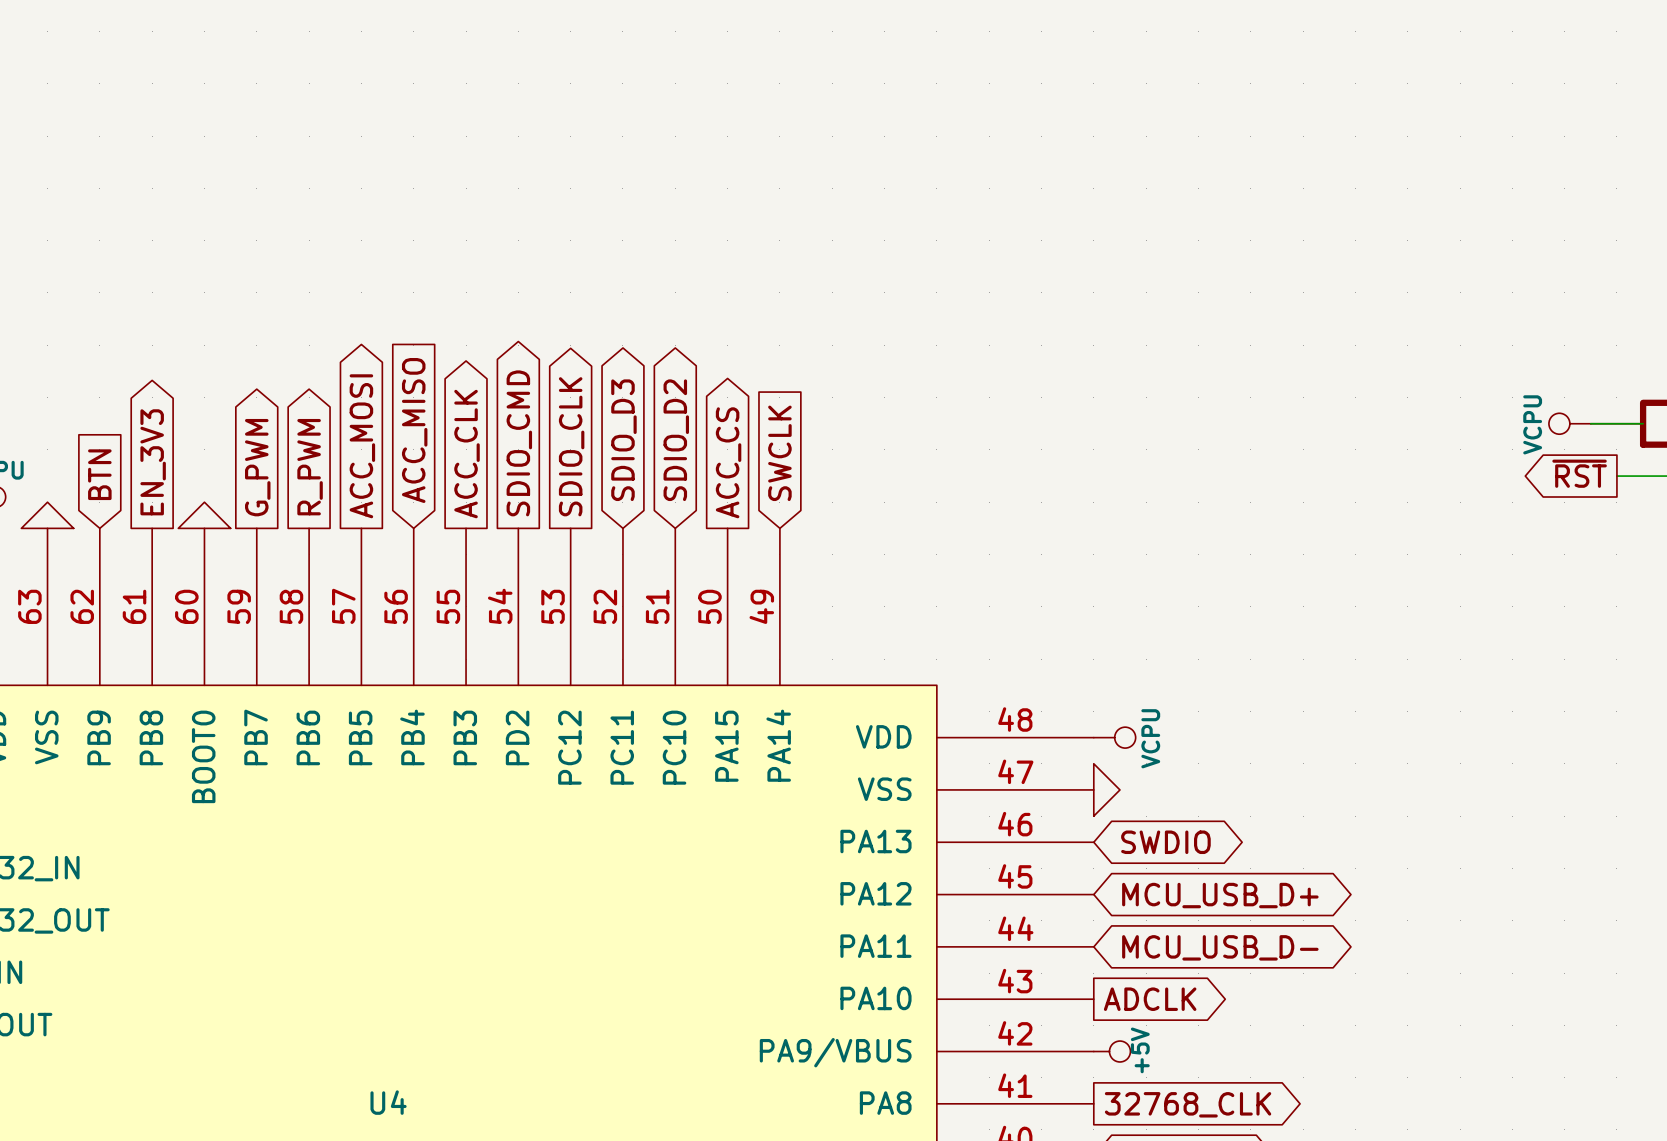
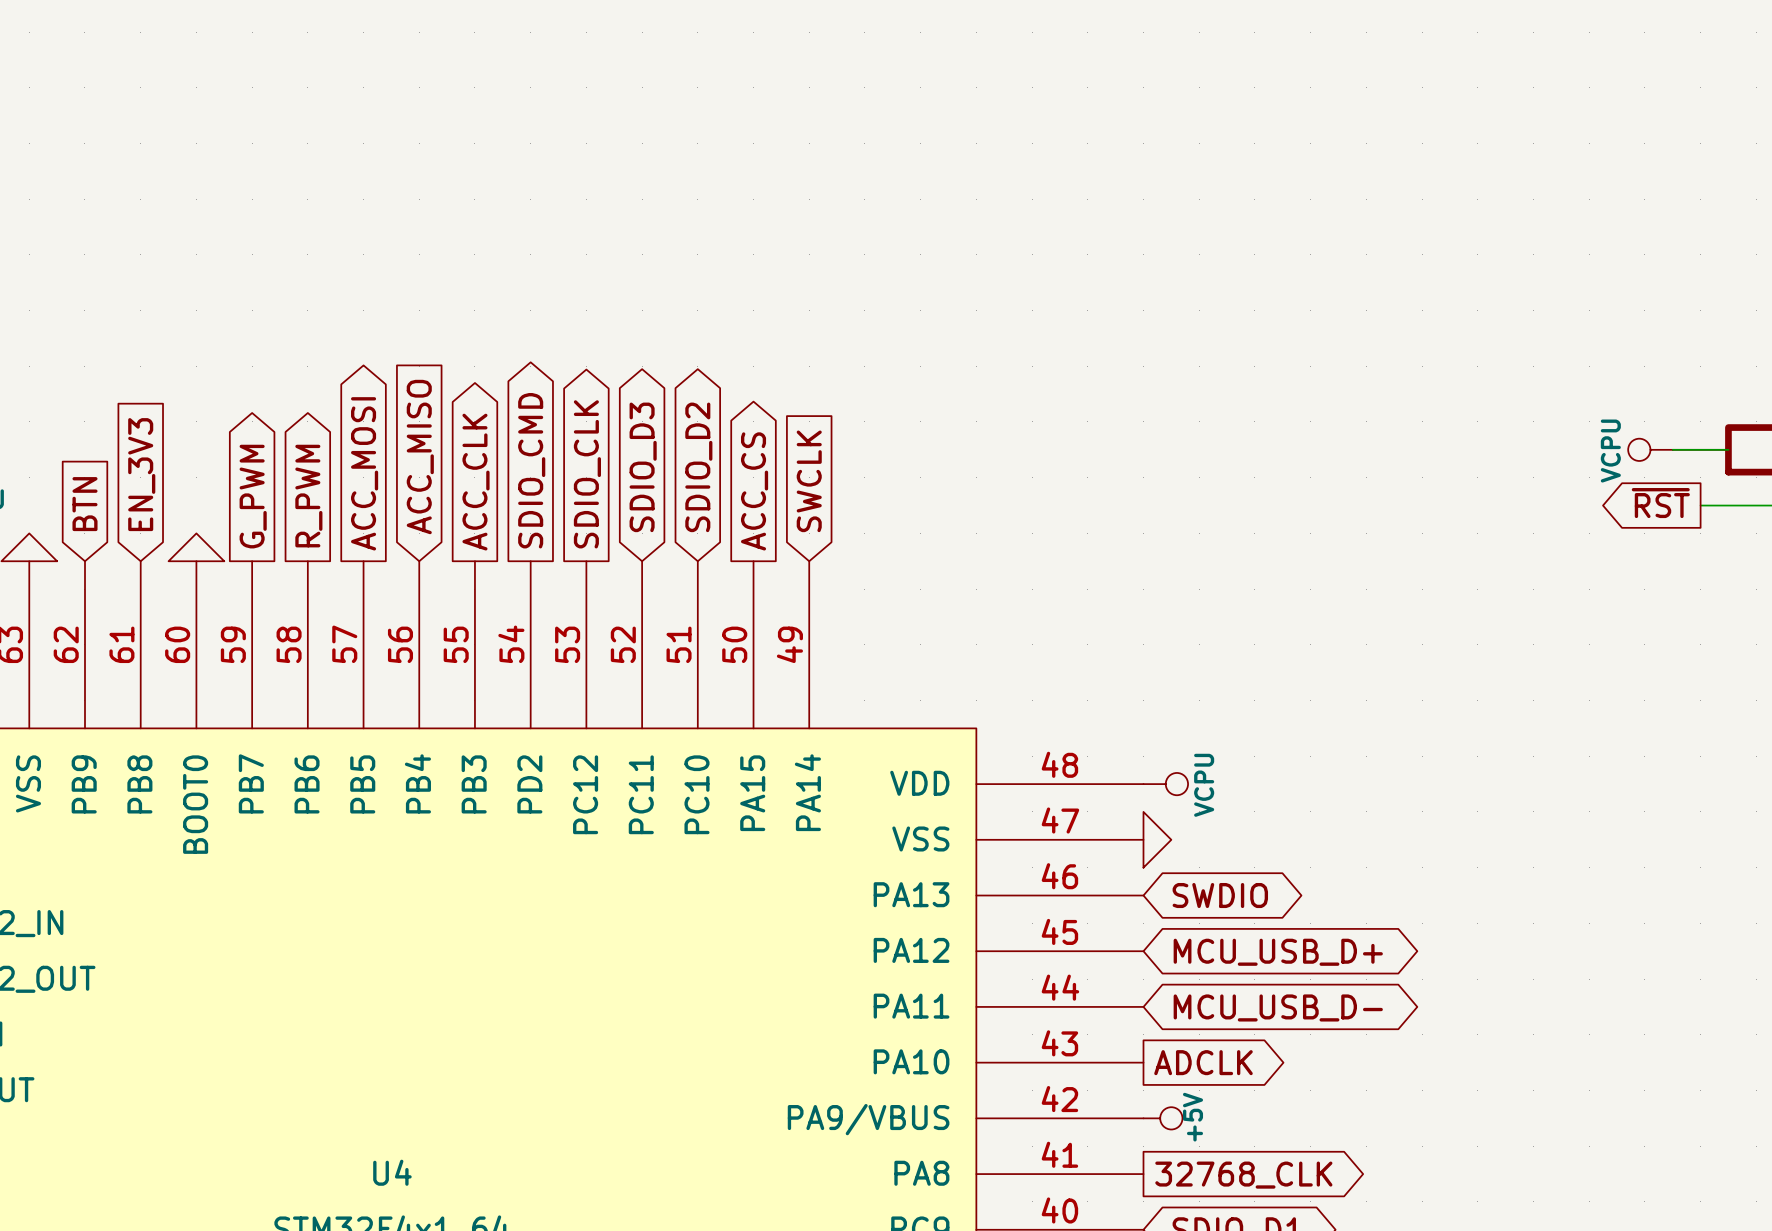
global label shape: output (153, 462) -> input (141, 474)

